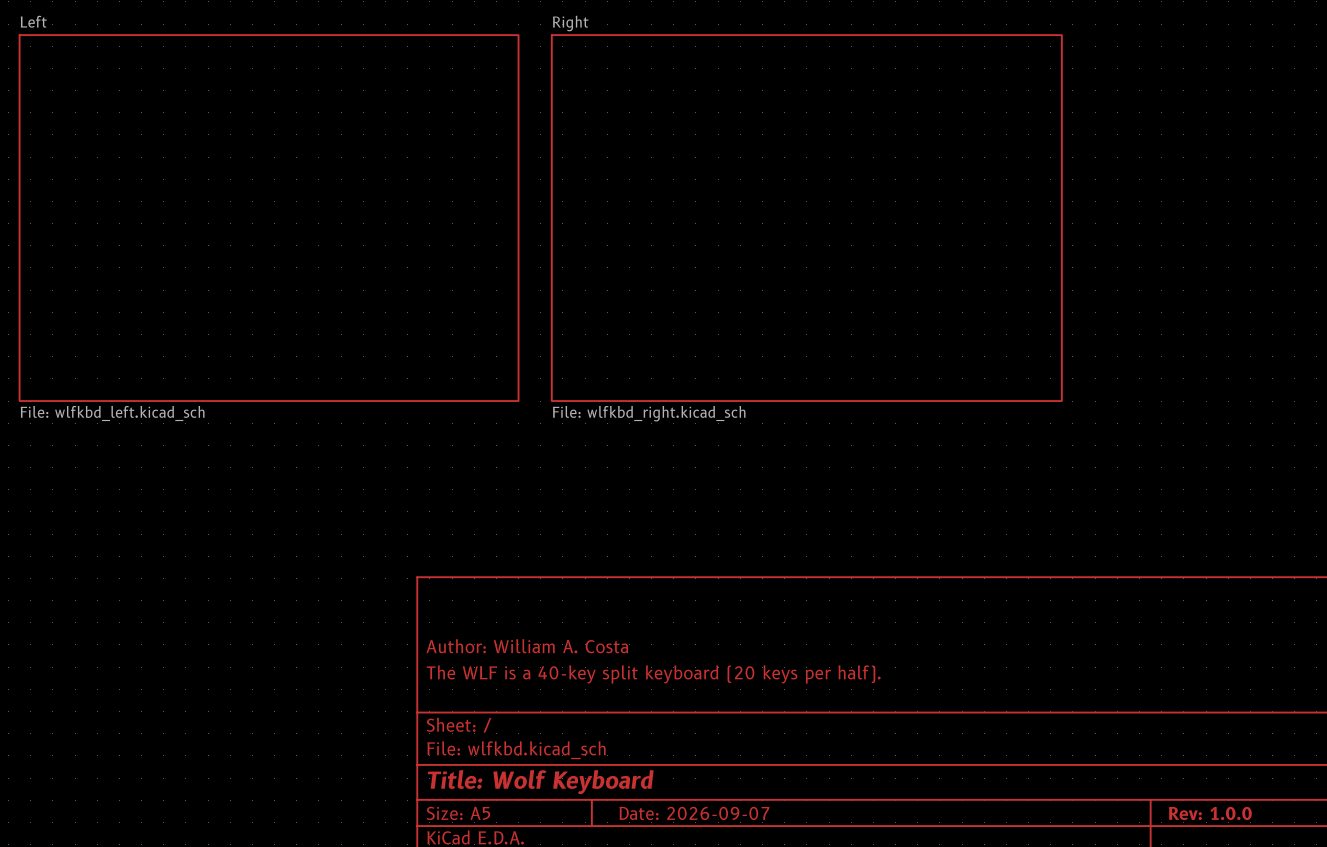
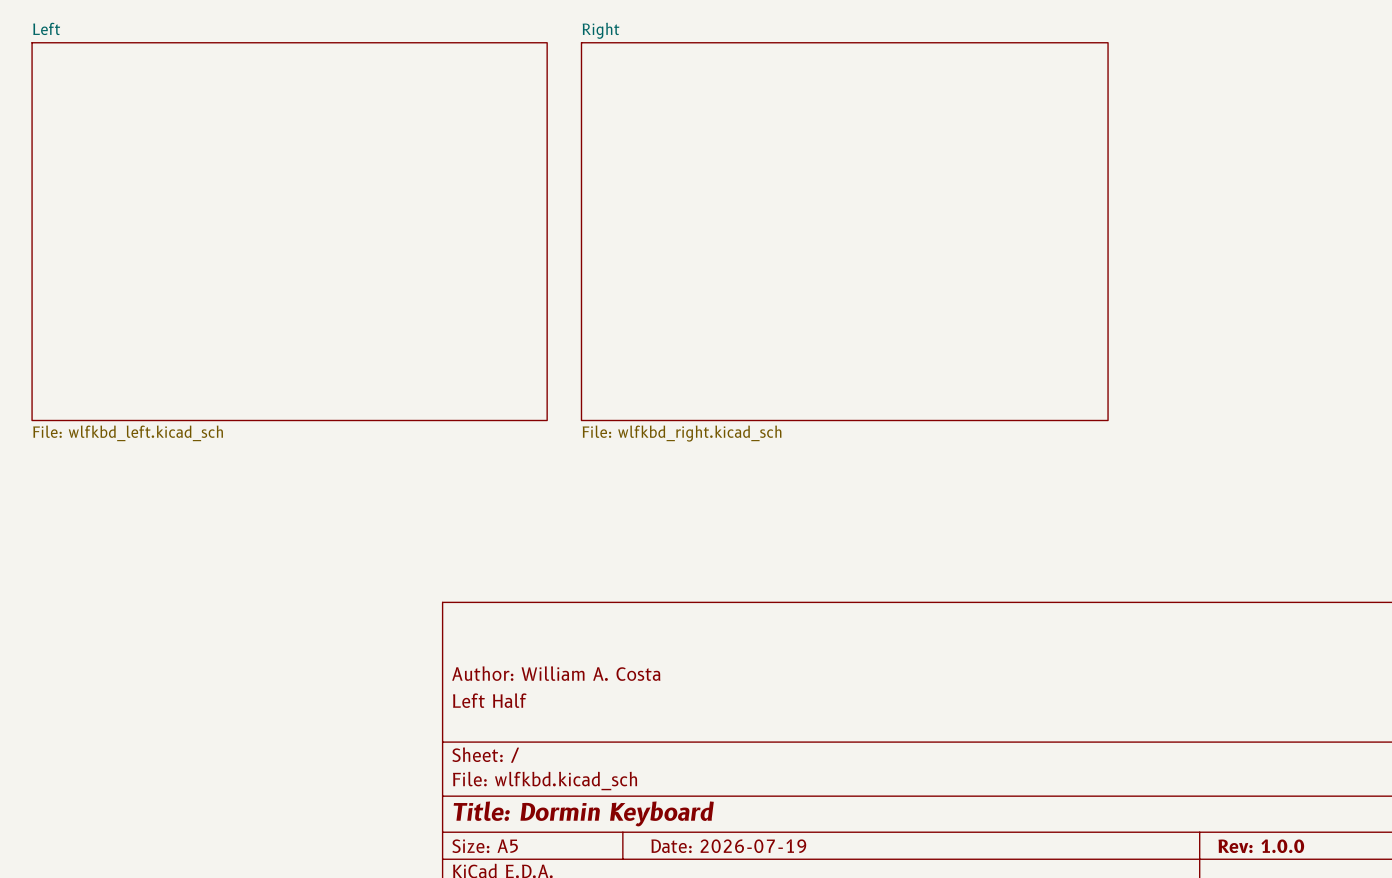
title block: The WLF is a 40-key split keyboard (20 keys per half). (653, 674) -> Left Half (489, 700)
title block: Title: Wolf Keyboard (540, 782) -> Title: Dormin Keyboard (583, 813)
title block: Date: 2026-09-07 (694, 813) -> Date: 2026-07-19 (728, 846)

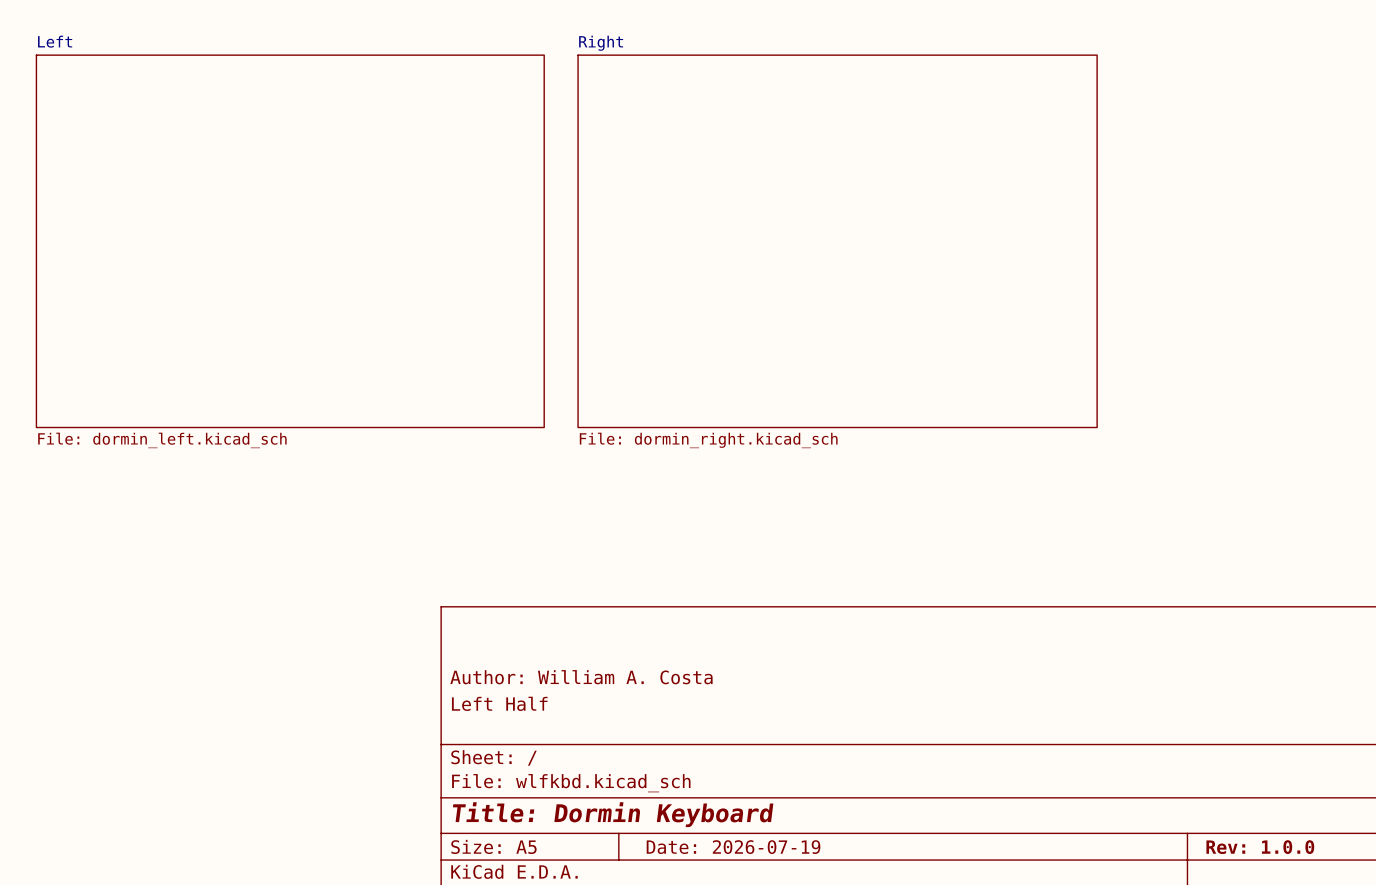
sheet Left value: File: wlfkbd_left.kicad_sch (128, 433) -> File: dormin_left.kicad_sch (162, 440)
sheet Right value: File: wlfkbd_right.kicad_sch (682, 433) -> File: dormin_right.kicad_sch (708, 440)

